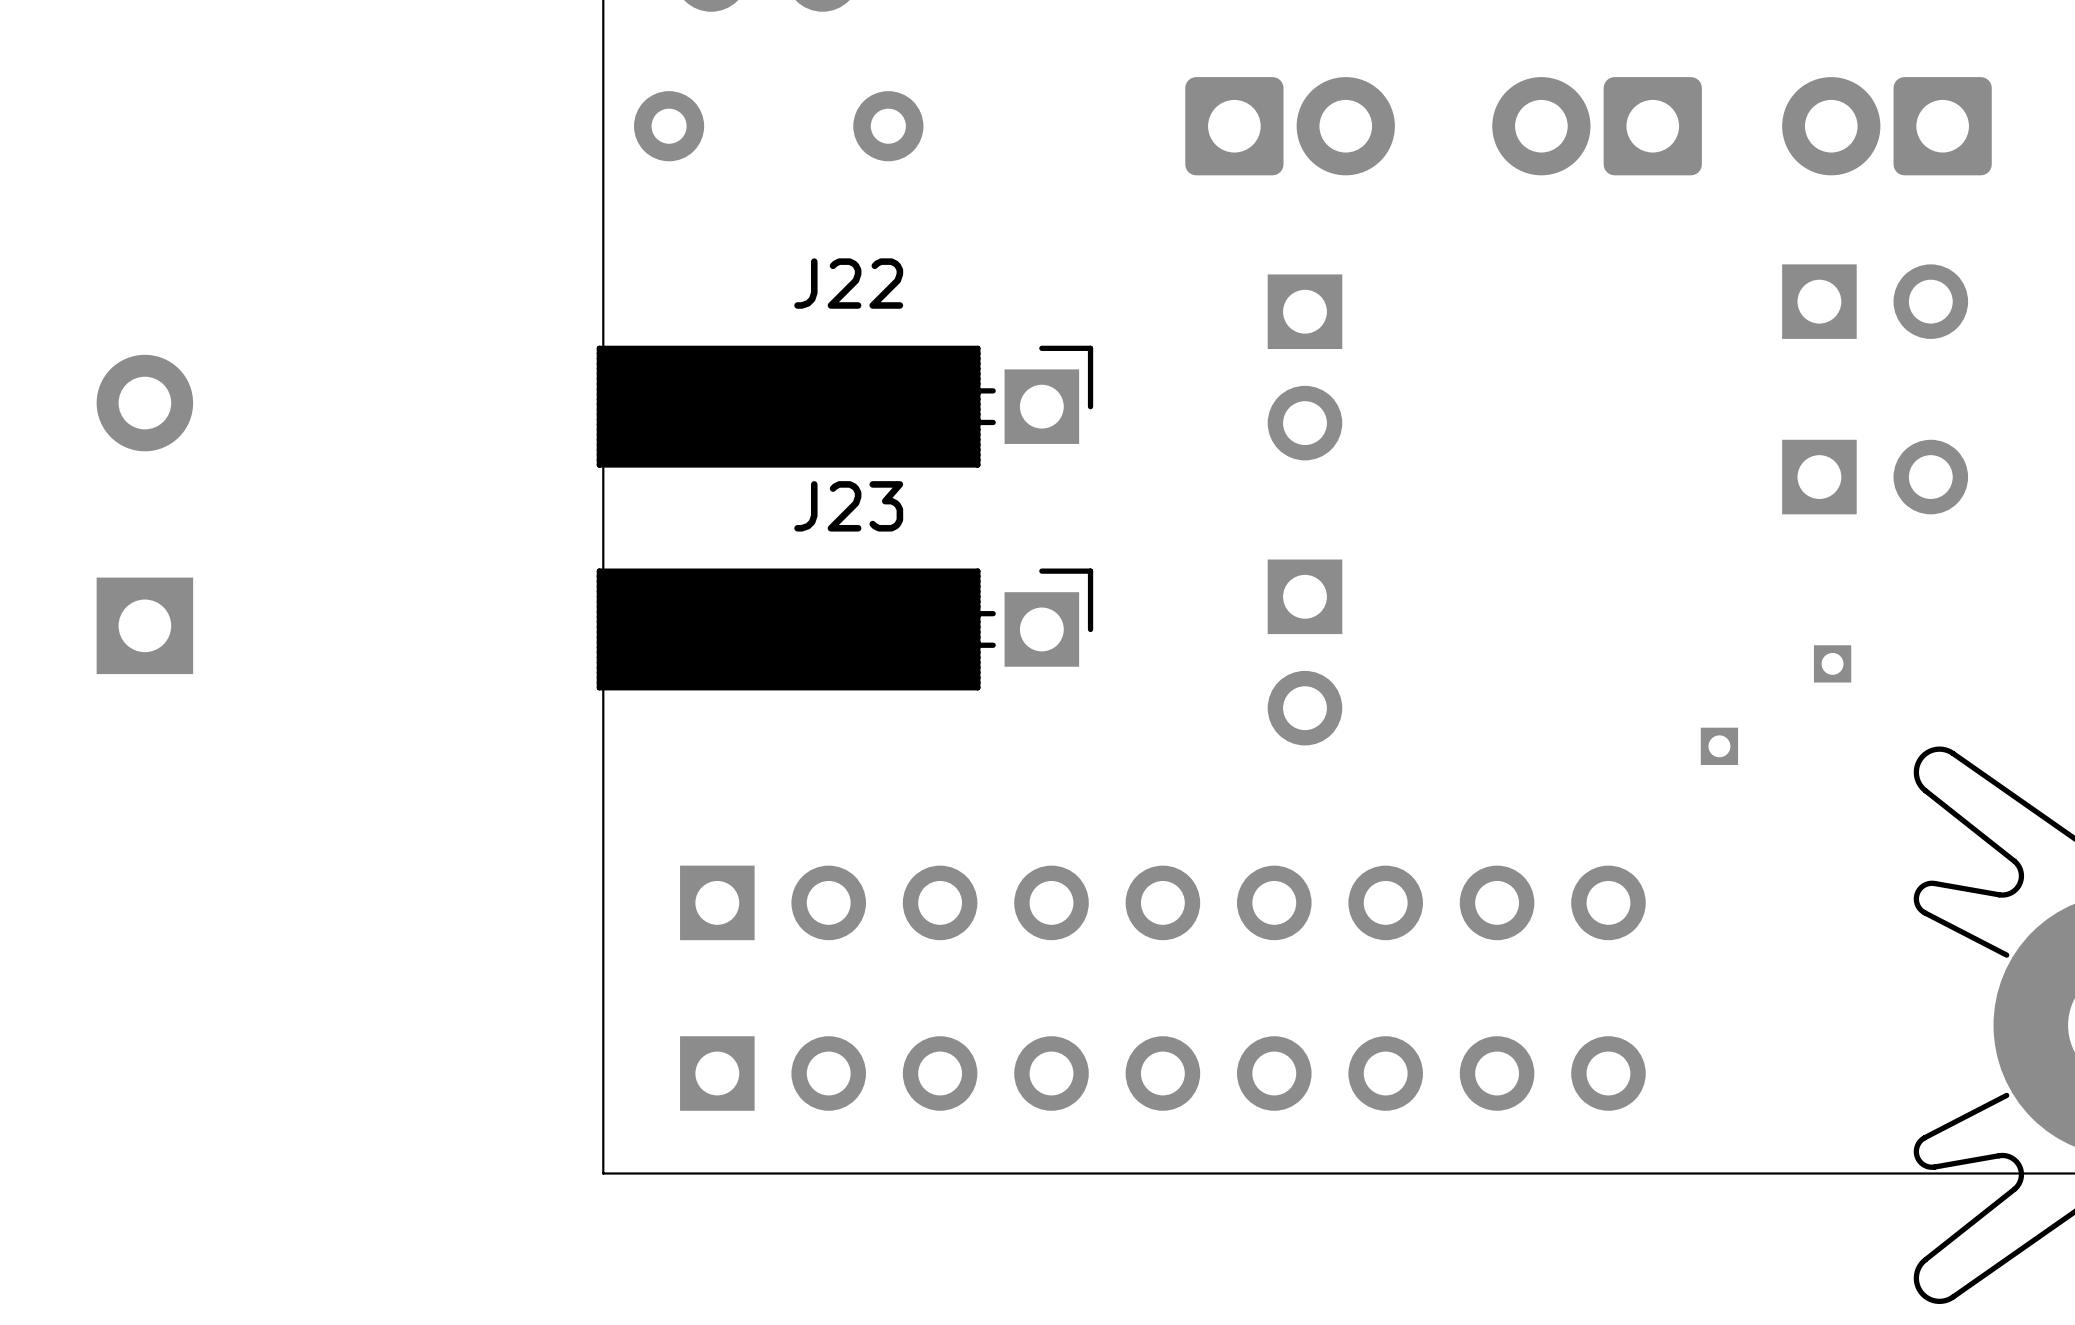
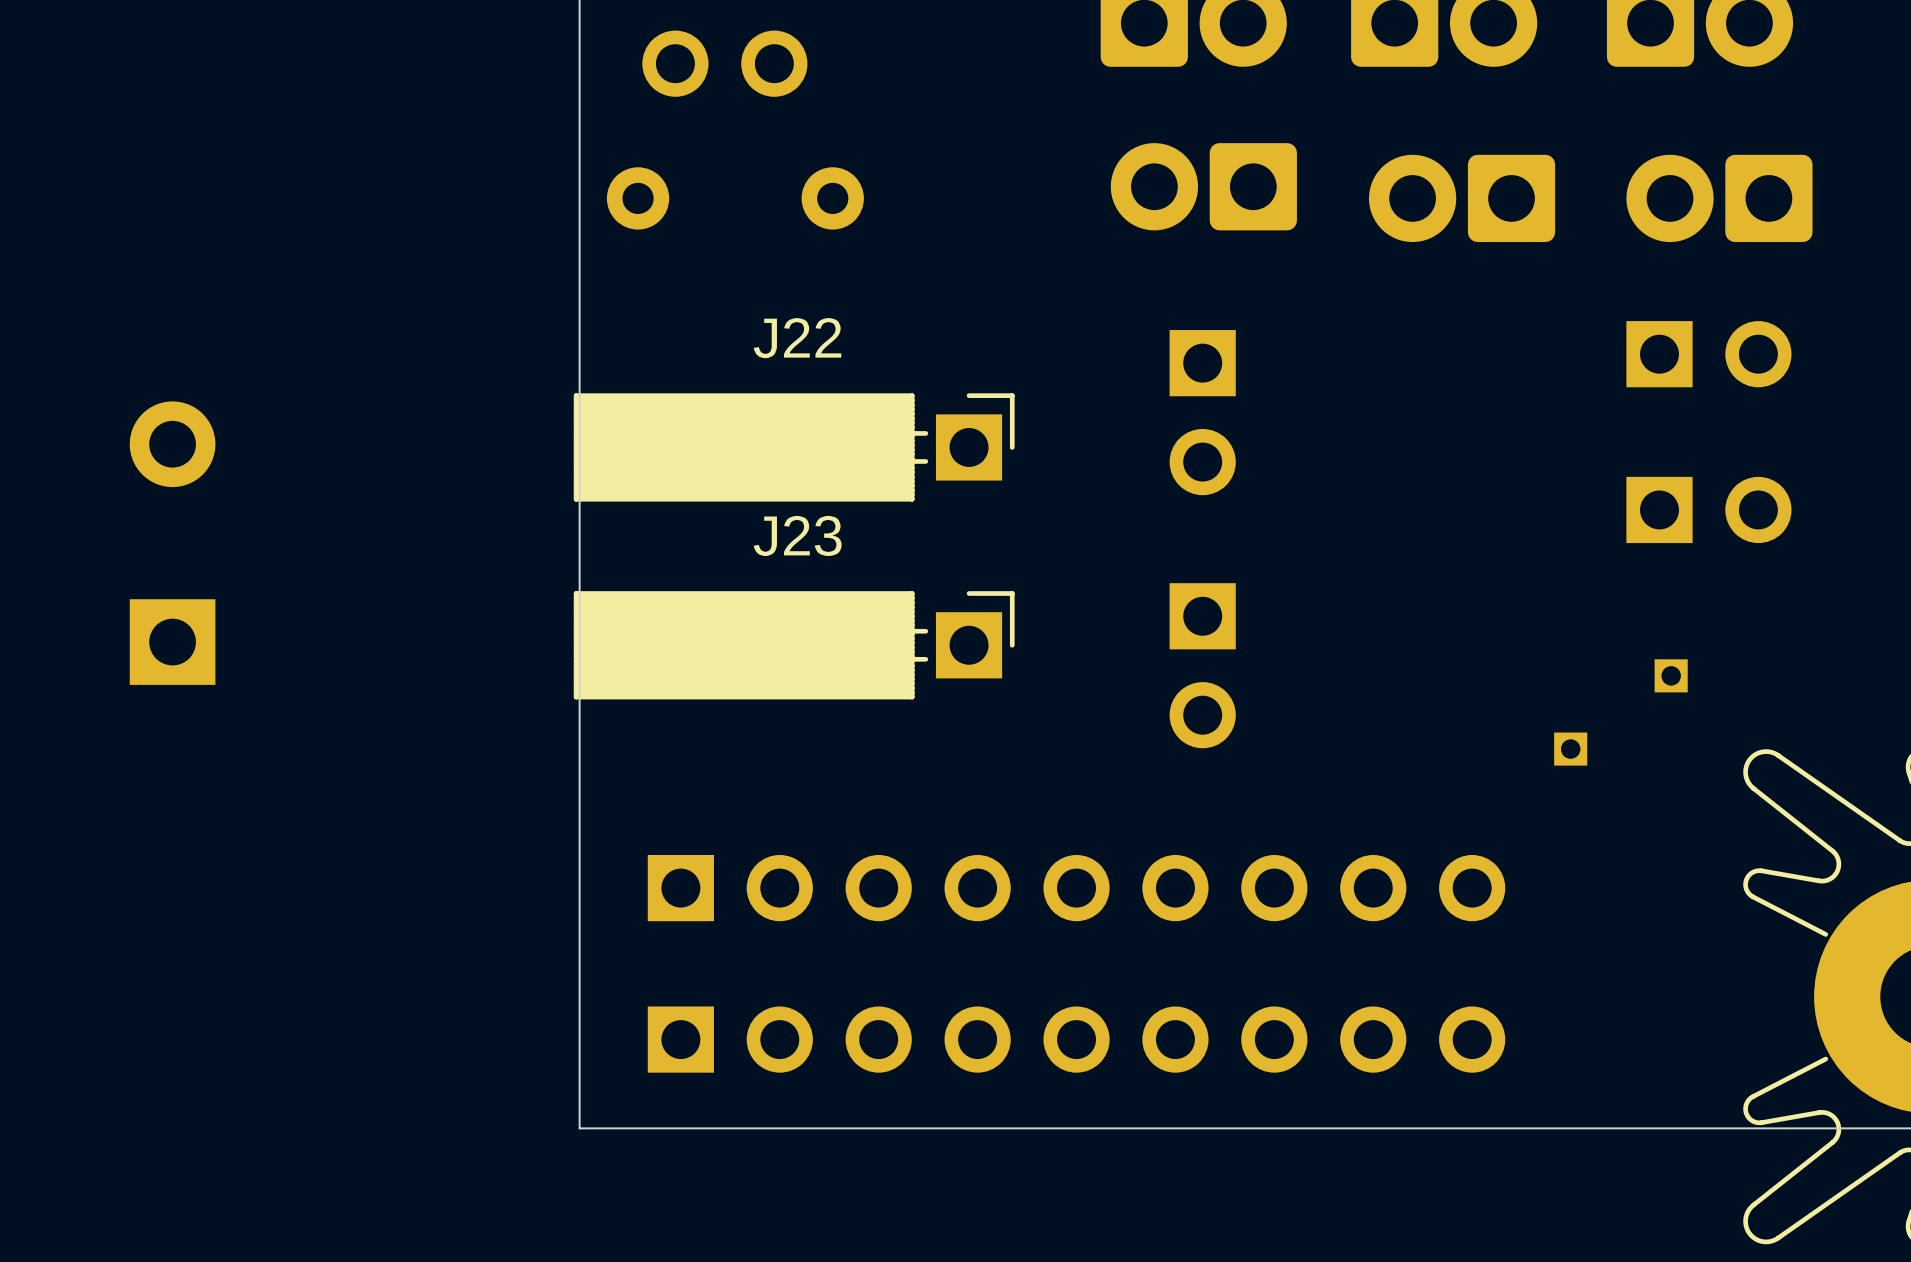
part rotation: 0° (1290, 126) -> 180° (1203, 186)

